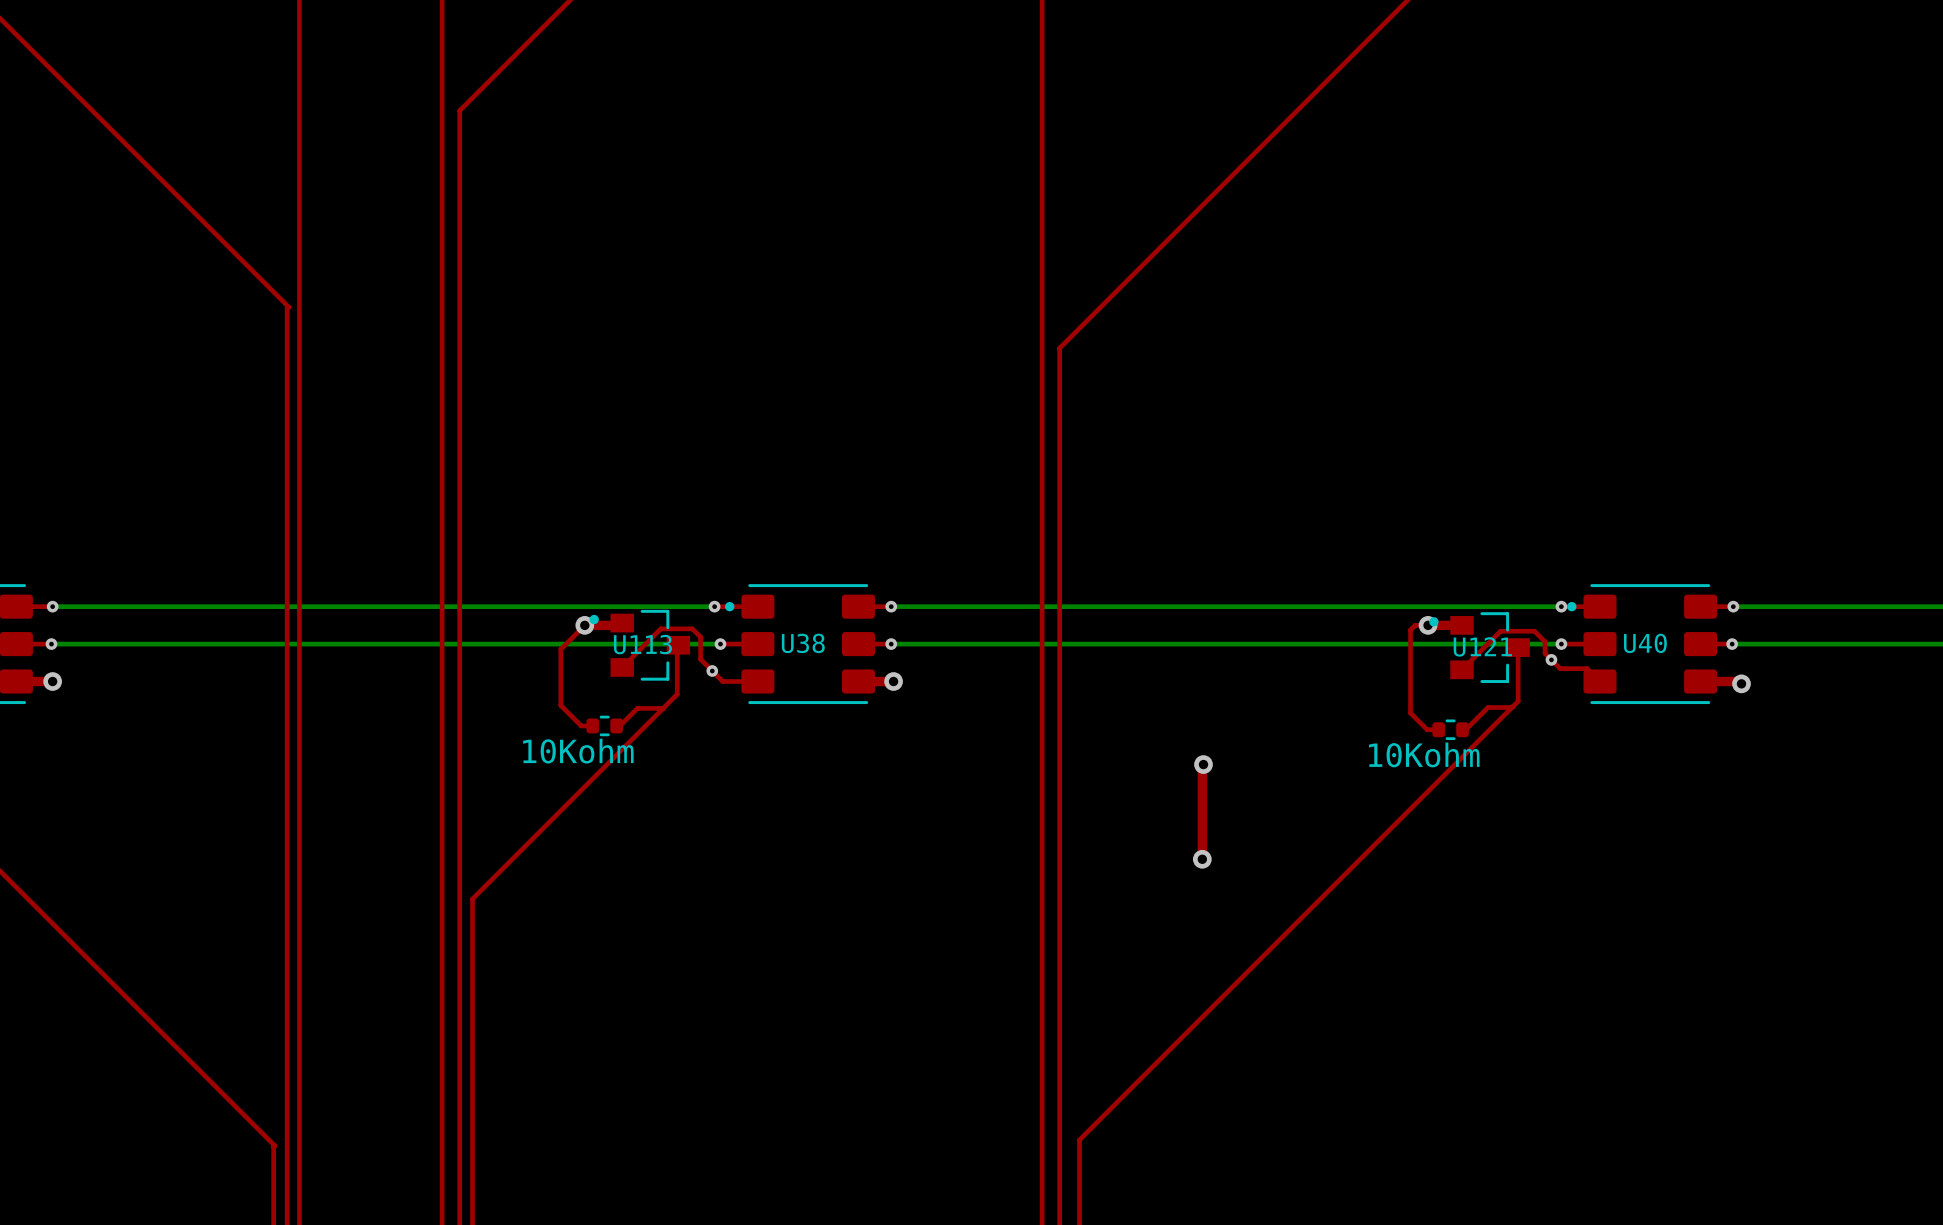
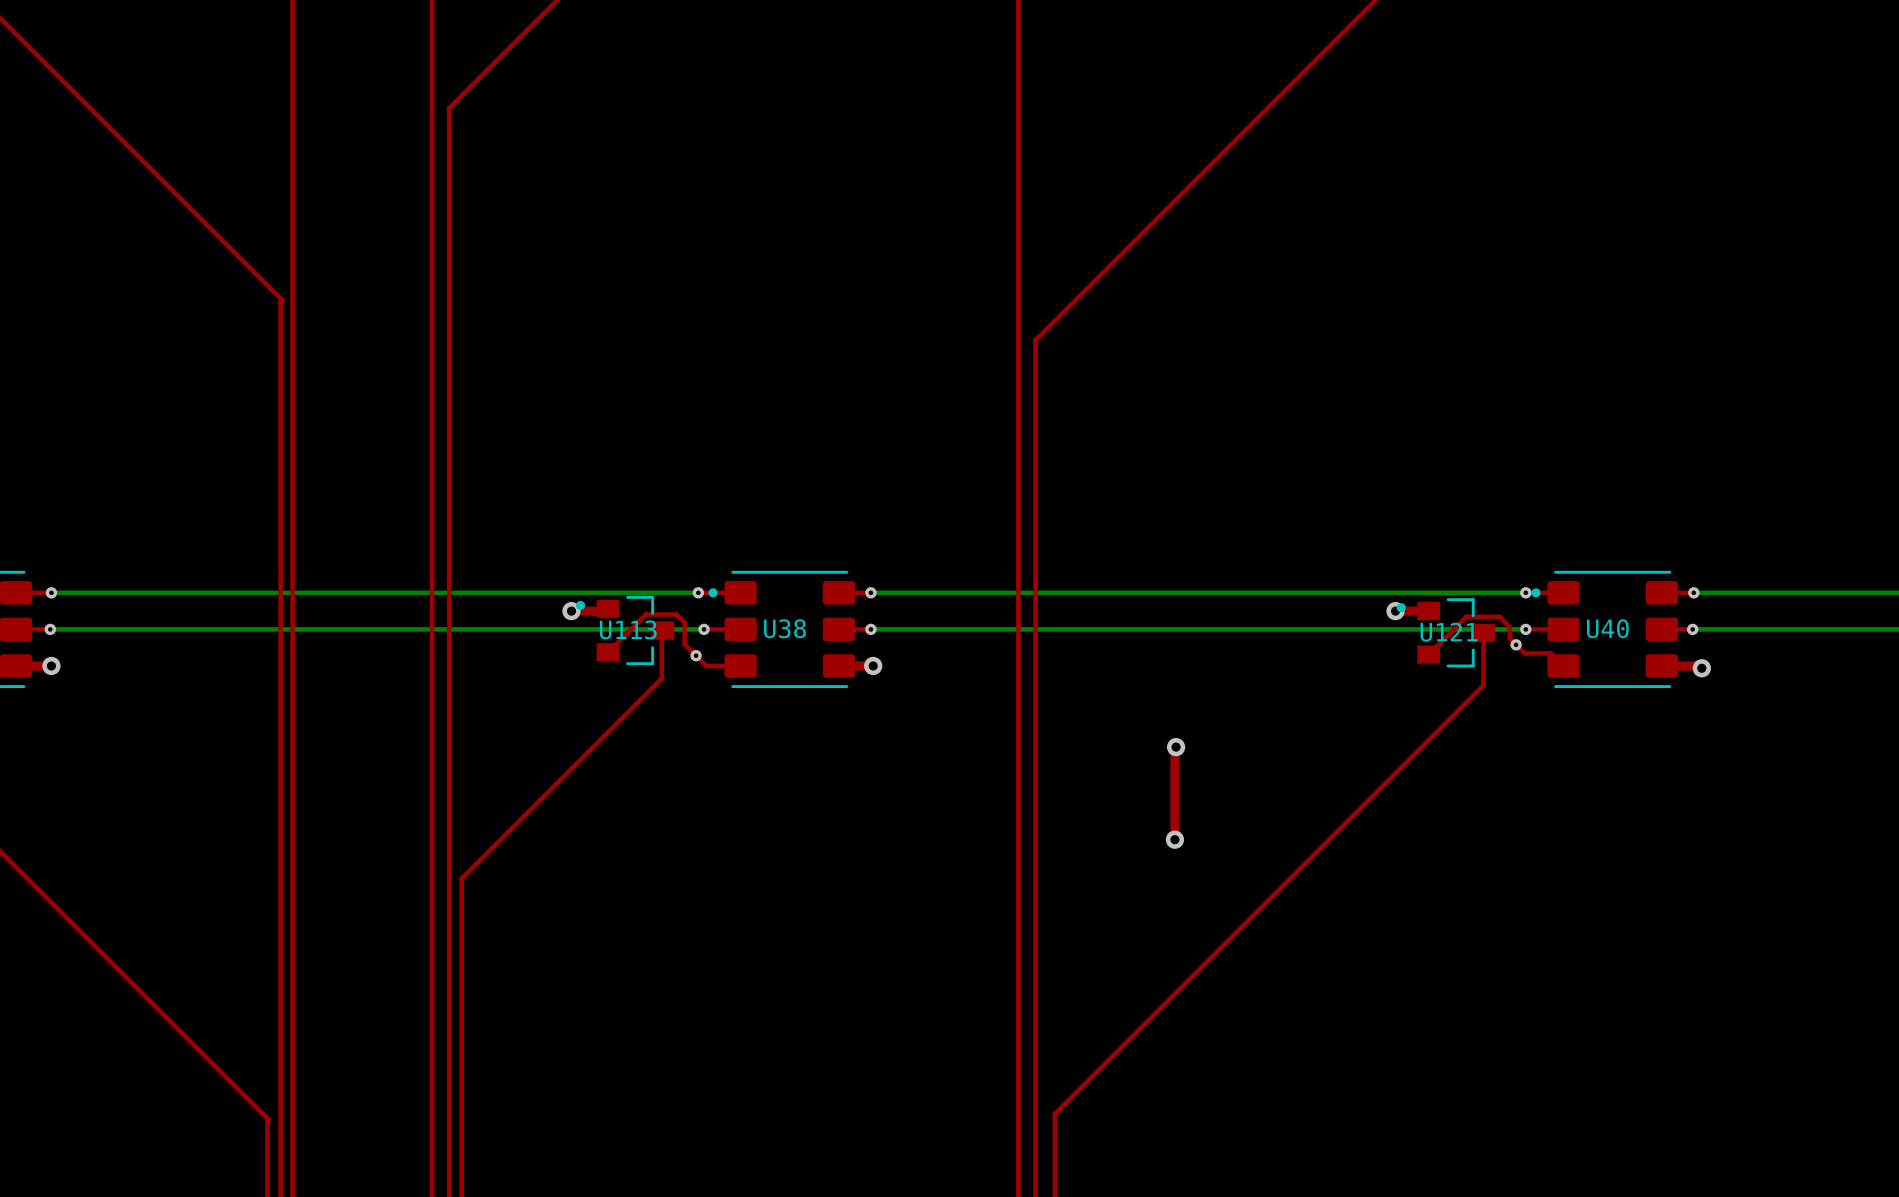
top track: (584, 625) (560, 649) (560, 705) (581, 725) (592, 725) -> none
top track: (1428, 625) (1415, 625) (1410, 630) (1410, 713) (1427, 729) (1438, 729) -> none
top track: (1511, 707) (1488, 707) (1465, 729) (1462, 729) -> none
top track: (663, 708) (637, 708) (619, 725) (616, 725) -> none
10Kohm: (604, 725) -> none
10Kohm: (1450, 729) -> none

